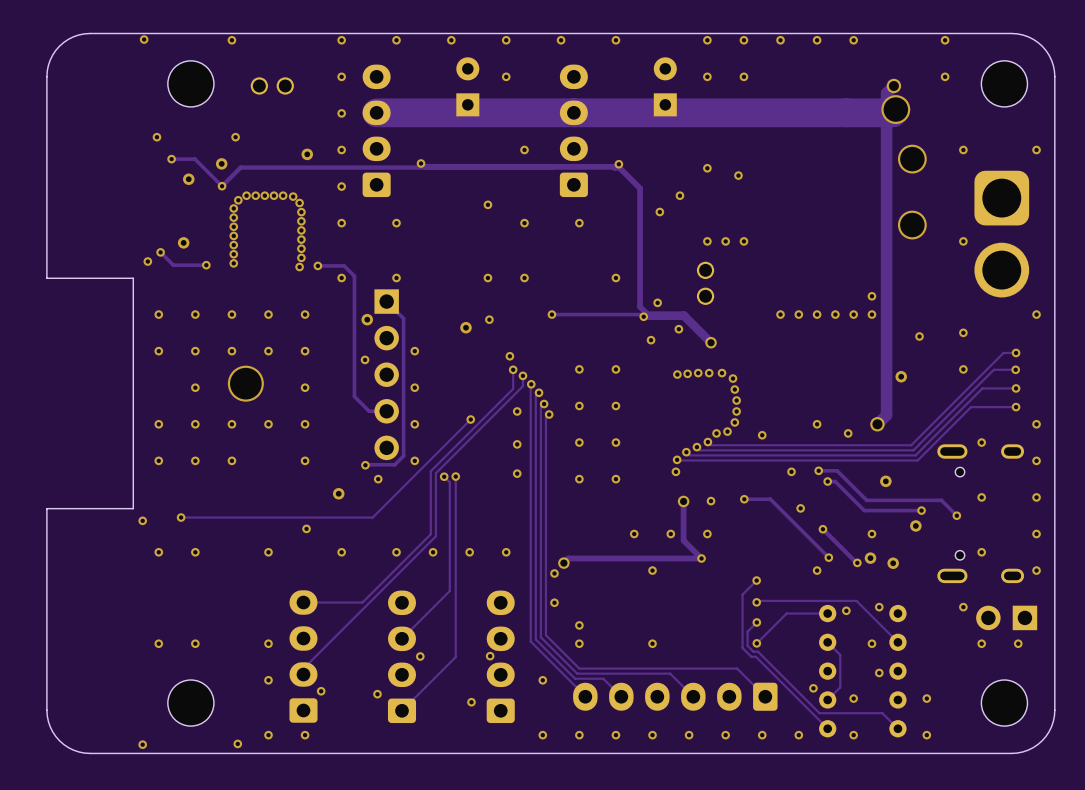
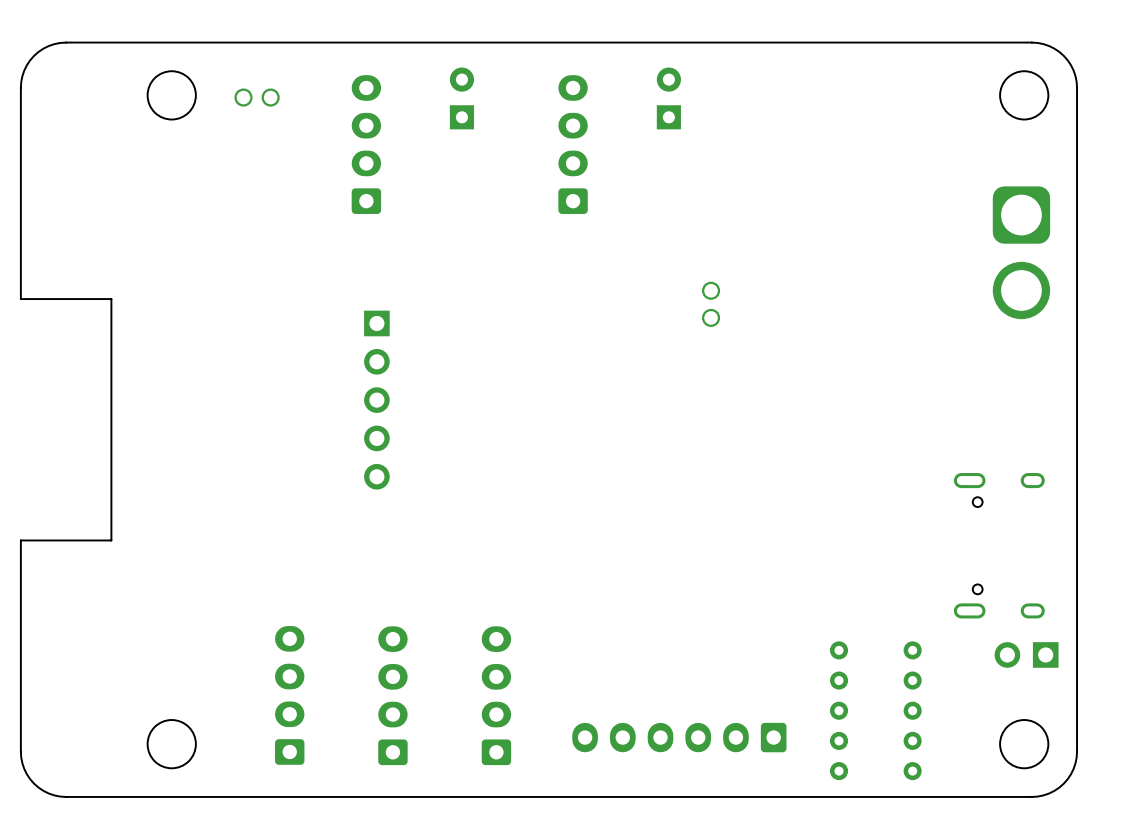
via: (144, 39) -> none
via: (231, 40) -> none
via: (341, 40) -> none
via: (396, 40) -> none
via: (451, 40) -> none
via: (506, 40) -> none
via: (561, 40) -> none
via: (615, 40) -> none
via: (707, 40) -> none
via: (743, 40) -> none
via: (780, 40) -> none
via: (817, 40) -> none
via: (853, 40) -> none
via: (945, 40) -> none
via: (341, 76) -> none
via: (506, 76) -> none
via: (707, 76) -> none
via: (743, 76) -> none
via: (945, 76) -> none
track: (893, 85) (886, 93) (886, 415) (877, 424) -> none
via: (893, 85) -> none
track: (895, 109) (892, 112) (376, 112) -> none
via: (895, 109) -> none
via: (341, 113) -> none
via: (156, 137) -> none
via: (235, 137) -> none
via: (341, 149) -> none
via: (524, 149) -> none
via: (963, 149) -> none
via: (1036, 149) -> none
via: (307, 154) -> none
track: (171, 159) (194, 159) (222, 186) (240, 167) (552, 166) -> none
via: (171, 159) -> none
via: (912, 159) -> none
via: (221, 163) -> none
track: (421, 163) (424, 166) (619, 167) (640, 188) (640, 306) (648, 315) -> none
via: (421, 163) -> none
via: (618, 164) -> none
via: (707, 168) -> none
via: (738, 175) -> none
via: (188, 179) -> none
via: (222, 186) -> none
via: (341, 186) -> none
via: (246, 195) -> none
via: (255, 195) -> none
via: (264, 195) -> none
via: (273, 195) -> none
via: (283, 195) -> none
via: (679, 195) -> none
via: (293, 196) -> none
via: (238, 200) -> none
via: (299, 203) -> none
via: (487, 204) -> none
via: (233, 208) -> none
via: (301, 212) -> none
via: (659, 212) -> none
via: (233, 217) -> none
via: (301, 221) -> none
via: (341, 223) -> none
via: (396, 223) -> none
via: (524, 223) -> none
via: (579, 223) -> none
via: (912, 225) -> none
via: (233, 226) -> none
via: (301, 230) -> none
via: (233, 235) -> none
via: (301, 239) -> none
via: (707, 241) -> none
via: (725, 241) -> none
via: (743, 241) -> none
via: (963, 241) -> none
via: (183, 242) -> none
via: (233, 245) -> none
via: (301, 248) -> none
track: (160, 252) (173, 265) (206, 265) -> none
via: (160, 252) -> none
via: (233, 254) -> none
via: (301, 257) -> none
via: (147, 261) -> none
via: (233, 263) -> none
via: (206, 265) -> none
track: (317, 265) (344, 265) (354, 276) (354, 396) (369, 411) (386, 411) -> none
via: (317, 265) -> none
via: (299, 267) -> none
via: (341, 277) -> none
via: (396, 277) -> none
via: (487, 277) -> none
via: (524, 277) -> none
via: (615, 277) -> none
via: (871, 296) -> none
track: (386, 301) (403, 318) (403, 455) (394, 464) (365, 465) -> none
via: (657, 302) -> none
via: (158, 314) -> none
via: (195, 314) -> none
via: (231, 314) -> none
via: (268, 314) -> none
via: (305, 314) -> none
track: (551, 314) (648, 315) -> none
via: (551, 314) -> none
via: (780, 314) -> none
via: (798, 314) -> none
via: (817, 314) -> none
via: (835, 314) -> none
via: (853, 314) -> none
via: (871, 314) -> none
via: (1036, 314) -> none
track: (648, 315) (683, 315) (711, 342) -> none
via: (643, 316) -> none
via: (367, 319) -> none
via: (489, 319) -> none
via: (466, 327) -> none
via: (678, 329) -> none
via: (963, 332) -> none
via: (919, 336) -> none
via: (651, 340) -> none
via: (711, 342) -> none
via: (158, 351) -> none
via: (195, 351) -> none
via: (231, 351) -> none
via: (268, 351) -> none
via: (305, 351) -> none
via: (414, 351) -> none
track: (1016, 352) (1003, 352) (911, 445) -> none
via: (1016, 352) -> none
via: (509, 356) -> none
via: (365, 359) -> none
track: (513, 369) (513, 388) (430, 471) (430, 534) (362, 602) (303, 602) -> none
via: (513, 369) -> none
via: (579, 369) -> none
via: (615, 369) -> none
via: (963, 369) -> none
track: (1015, 369) (993, 369) (919, 444) -> none
via: (1015, 369) -> none
via: (687, 373) -> none
via: (698, 373) -> none
via: (709, 373) -> none
via: (722, 373) -> none
via: (677, 374) -> none
track: (522, 375) (522, 386) (435, 473) (435, 536) (303, 668) (303, 674) -> none
via: (522, 375) -> none
via: (901, 376) -> none
via: (732, 378) -> none
via: (245, 383) -> none
track: (531, 384) (530, 641) (585, 696) -> none
via: (531, 384) -> none
via: (195, 387) -> none
via: (305, 387) -> none
via: (414, 387) -> none
track: (1016, 388) (982, 388) (915, 455) (689, 455) (686, 452) -> none
via: (1016, 388) -> none
via: (734, 389) -> none
track: (539, 392) (535, 396) (535, 639) (575, 678) (603, 678) (621, 696) -> none
via: (539, 392) -> none
via: (736, 400) -> none
track: (544, 404) (540, 407) (540, 637) (577, 673) (670, 673) (693, 696) -> none
via: (544, 404) -> none
via: (579, 405) -> none
via: (615, 405) -> none
track: (1016, 407) (971, 407) (917, 460) (677, 459) -> none
via: (1016, 407) -> none
via: (517, 411) -> none
via: (736, 411) -> none
track: (549, 414) (545, 417) (545, 635) (579, 668) (737, 668) (765, 696) -> none
via: (549, 414) -> none
track: (470, 419) (372, 517) (181, 517) -> none
via: (470, 419) -> none
via: (734, 422) -> none
via: (158, 424) -> none
via: (195, 424) -> none
via: (231, 424) -> none
via: (268, 424) -> none
via: (305, 424) -> none
via: (414, 424) -> none
via: (817, 424) -> none
via: (877, 424) -> none
via: (1036, 424) -> none
via: (727, 431) -> none
via: (716, 433) -> none
via: (848, 433) -> none
via: (762, 435) -> none
via: (579, 442) -> none
via: (615, 442) -> none
track: (707, 442) (711, 445) (911, 445) -> none
via: (707, 442) -> none
via: (981, 442) -> none
via: (517, 444) -> none
track: (919, 444) (913, 450) (700, 450) (696, 447) -> none
via: (696, 447) -> none
via: (686, 452) -> none
via: (677, 459) -> none
via: (158, 460) -> none
via: (195, 460) -> none
via: (231, 460) -> none
via: (305, 460) -> none
via: (414, 460) -> none
via: (1036, 460) -> none
via: (365, 465) -> none
track: (818, 470) (837, 470) (866, 500) (941, 500) (956, 515) -> none
via: (818, 470) -> none
via: (675, 471) -> none
via: (791, 471) -> none
via: (517, 473) -> none
track: (444, 476) (449, 482) (449, 590) (401, 638) -> none
via: (444, 476) -> none
track: (455, 476) (455, 657) (401, 710) -> none
via: (455, 476) -> none
via: (378, 479) -> none
via: (579, 479) -> none
via: (615, 479) -> none
track: (827, 481) (835, 481) (864, 510) (921, 510) -> none
via: (827, 481) -> none
via: (885, 481) -> none
via: (338, 493) -> none
via: (981, 497) -> none
via: (1036, 497) -> none
track: (744, 499) (770, 499) (828, 557) -> none
via: (744, 499) -> none
track: (683, 501) (683, 540) (701, 558) (568, 558) (563, 563) -> none
via: (683, 501) -> none
via: (711, 501) -> none
via: (800, 508) -> none
via: (921, 510) -> none
via: (956, 515) -> none
via: (181, 517) -> none
via: (142, 520) -> none
via: (915, 525) -> none
via: (306, 528) -> none
track: (822, 529) (857, 562) -> none
via: (822, 529) -> none
via: (634, 534) -> none
via: (670, 534) -> none
via: (707, 534) -> none
via: (871, 534) -> none
via: (1036, 534) -> none
via: (158, 552) -> none
via: (195, 552) -> none
via: (268, 552) -> none
via: (341, 552) -> none
via: (396, 552) -> none
via: (433, 552) -> none
via: (469, 552) -> none
via: (506, 552) -> none
via: (981, 552) -> none
via: (828, 557) -> none
via: (701, 558) -> none
via: (870, 558) -> none
via: (857, 562) -> none
via: (563, 563) -> none
via: (893, 563) -> none
via: (652, 570) -> none
via: (817, 570) -> none
via: (1036, 570) -> none
via: (554, 573) -> none
track: (756, 580) (742, 594) (742, 648) (751, 656) (755, 656) (827, 728) -> none
via: (756, 580) -> none
via: (554, 602) -> none
track: (756, 602) (856, 600) (897, 642) -> none
via: (756, 602) -> none
via: (879, 607) -> none
via: (963, 607) -> none
via: (846, 610) -> none
track: (827, 613) (786, 613) (756, 643) -> none
track: (756, 622) (747, 631) (747, 645) (753, 651) (757, 651) (819, 713) (882, 713) (897, 728) -> none
via: (756, 622) -> none
via: (579, 625) -> none
track: (827, 642) (840, 654) (840, 687) (827, 699) -> none
via: (158, 643) -> none
via: (195, 643) -> none
via: (268, 643) -> none
via: (579, 643) -> none
via: (652, 643) -> none
via: (756, 643) -> none
via: (871, 643) -> none
via: (981, 643) -> none
via: (1018, 643) -> none
via: (420, 656) -> none
via: (490, 656) -> none
via: (879, 672) -> none
via: (268, 680) -> none
via: (542, 680) -> none
via: (813, 688) -> none
via: (321, 691) -> none
via: (377, 694) -> none
via: (853, 698) -> none
via: (926, 698) -> none
via: (471, 702) -> none
via: (268, 735) -> none
via: (305, 735) -> none
via: (542, 735) -> none
via: (579, 735) -> none
via: (615, 735) -> none
via: (652, 735) -> none
via: (689, 735) -> none
via: (725, 735) -> none
via: (762, 735) -> none
via: (798, 735) -> none
via: (853, 735) -> none
via: (926, 735) -> none
via: (237, 743) -> none
via: (142, 744) -> none

